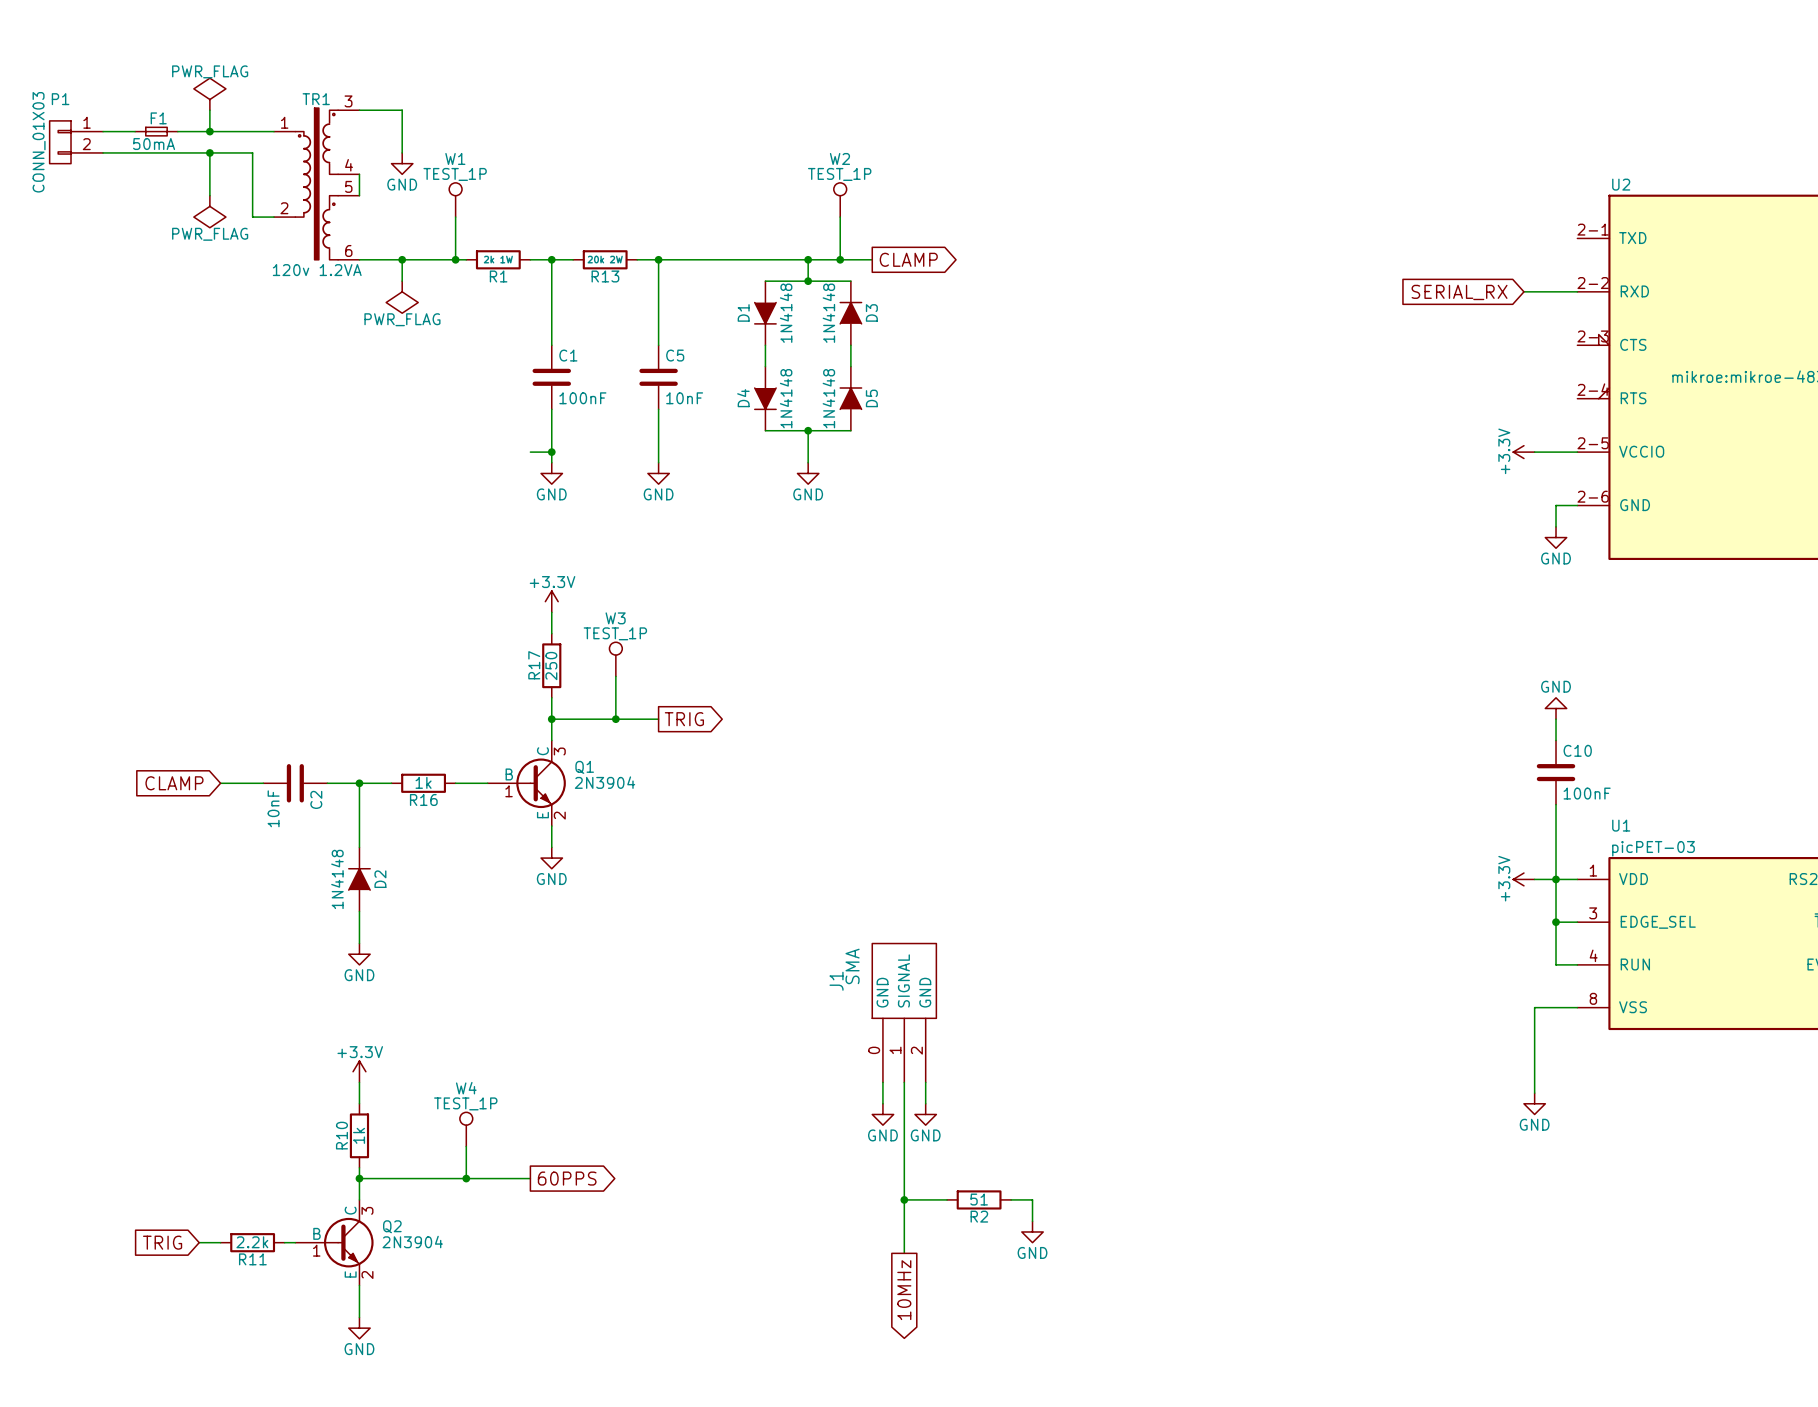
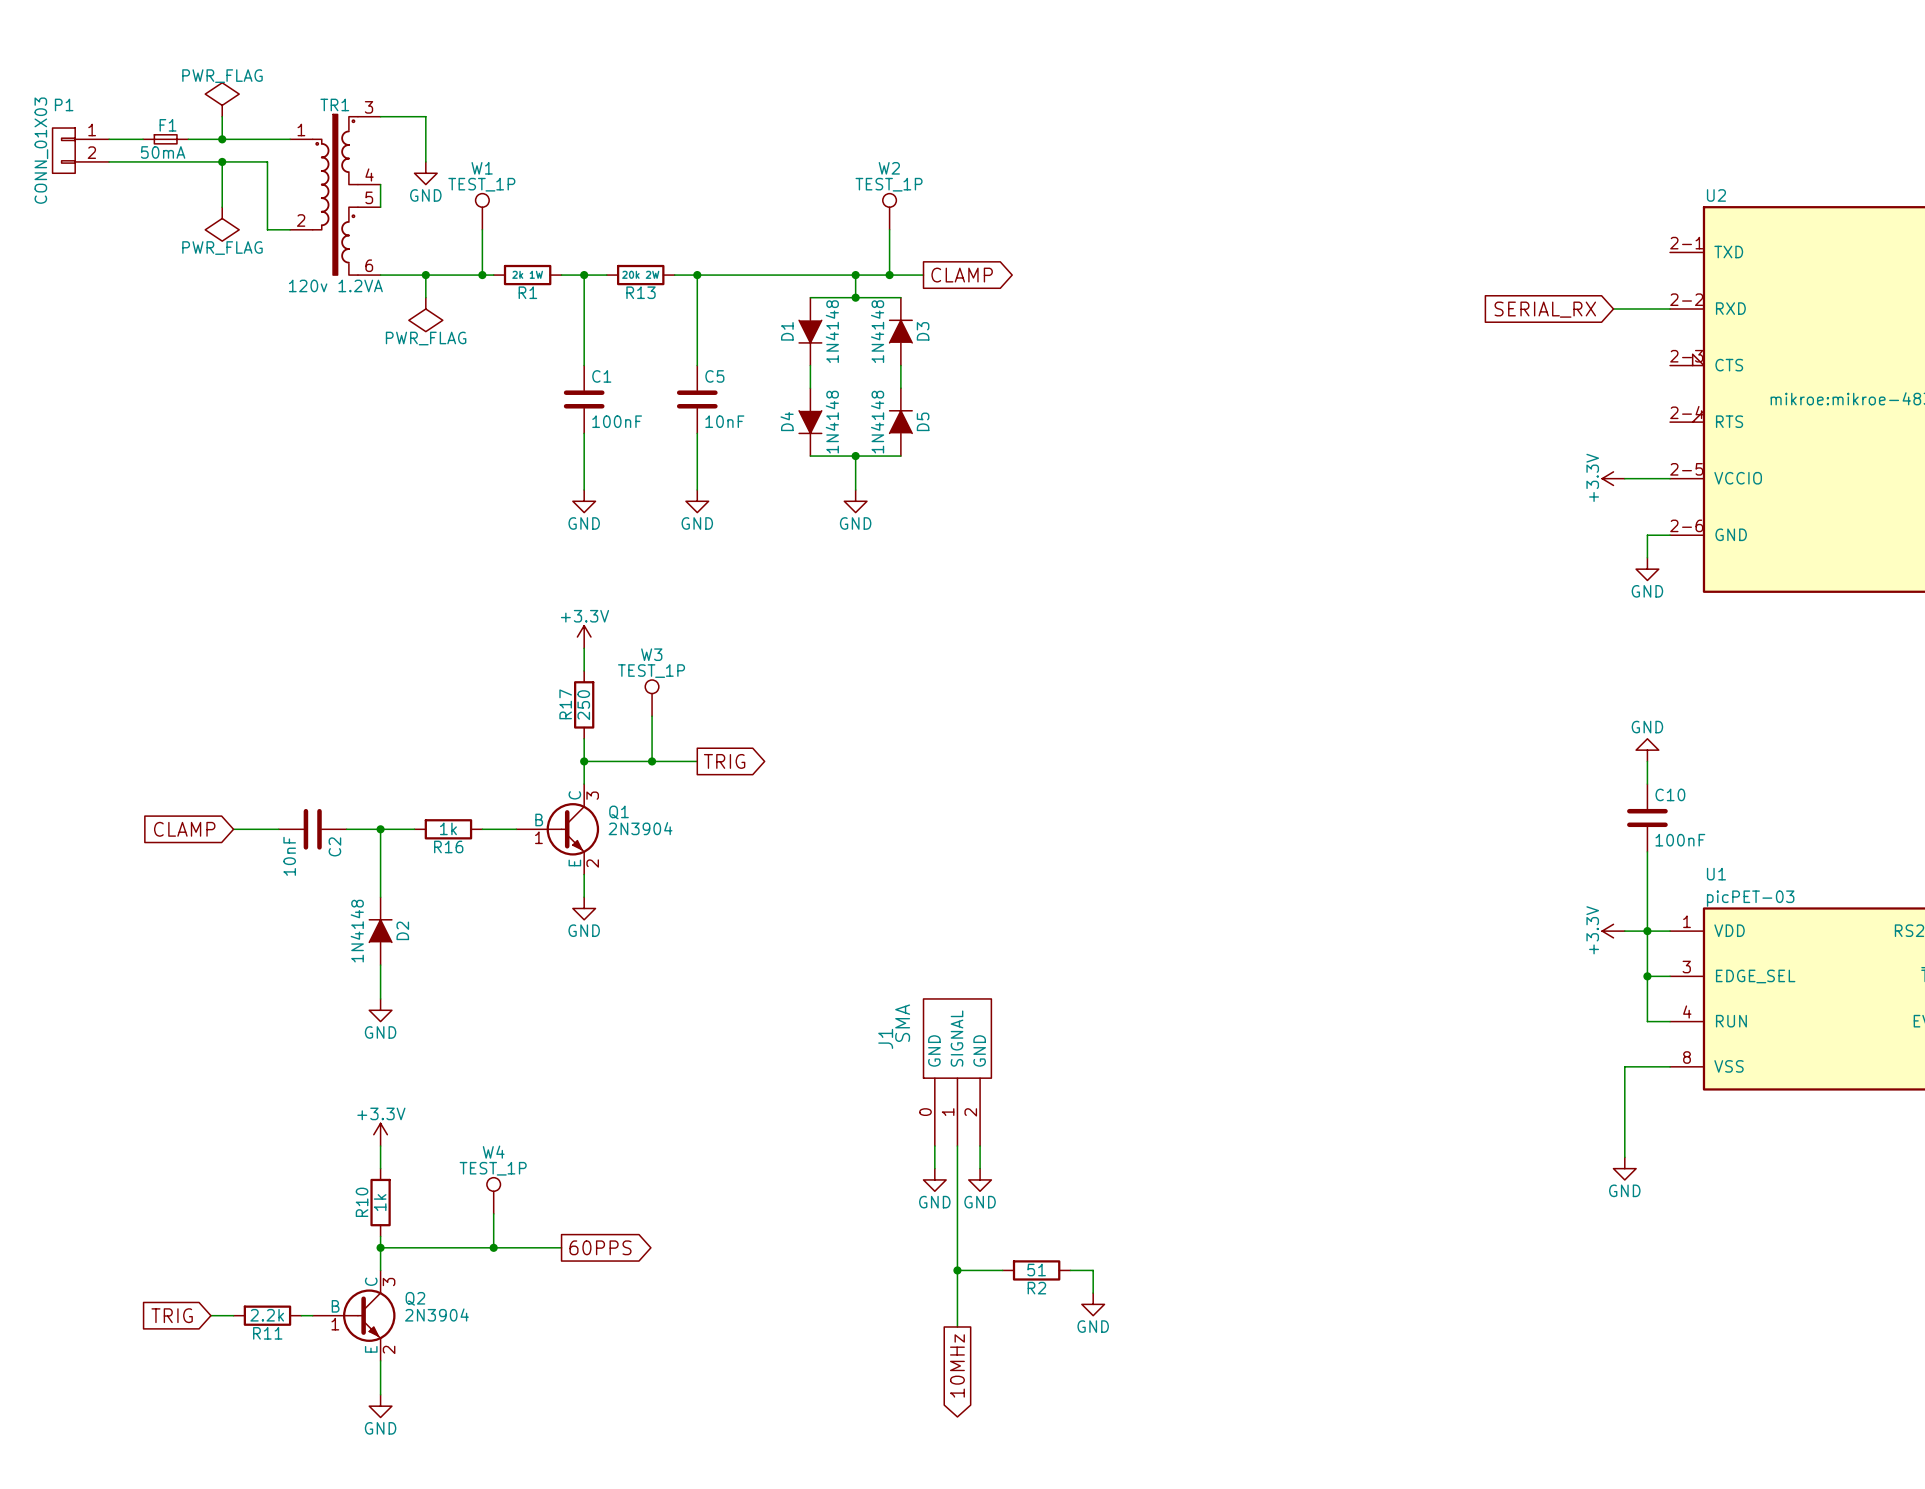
wire: (530, 452) (551, 452) -> none
junction: (551, 452) -> none

